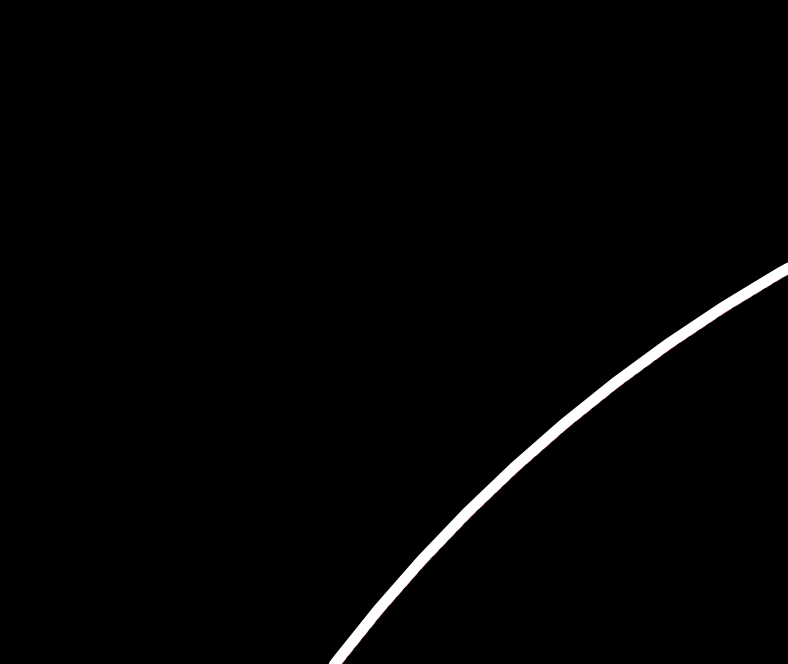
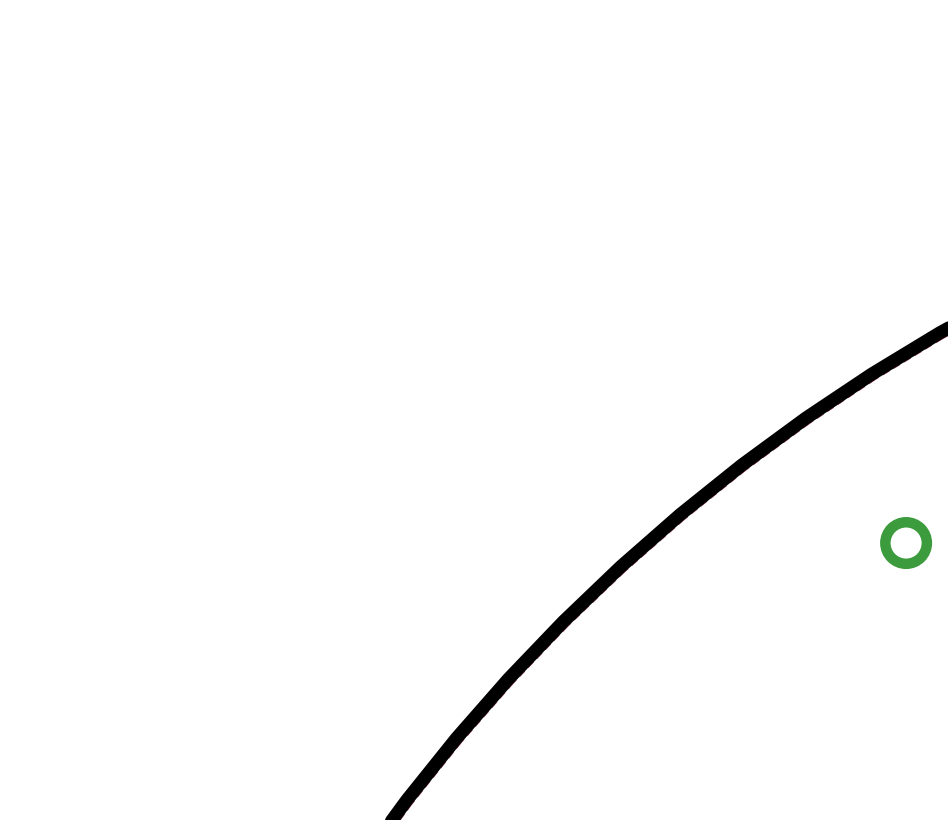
via: none -> (906, 543)

